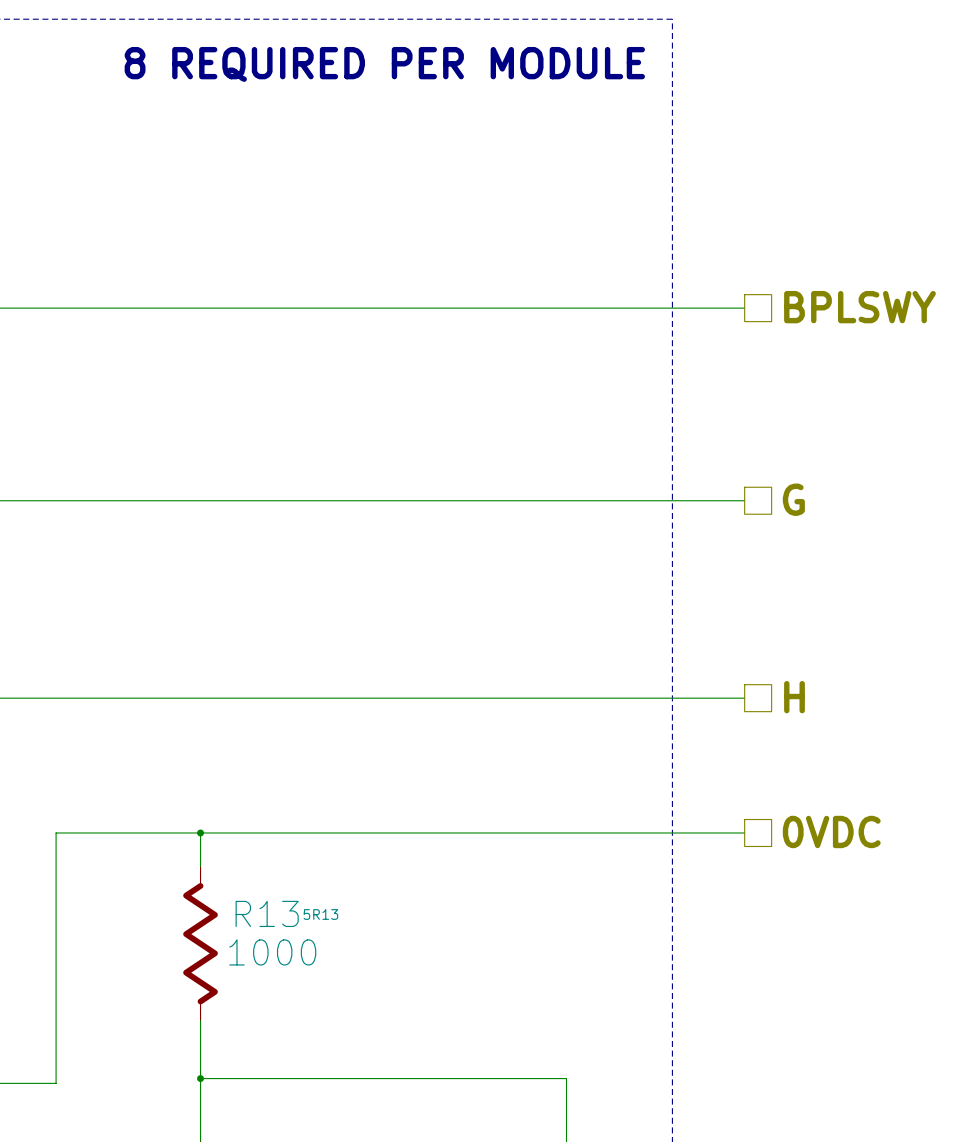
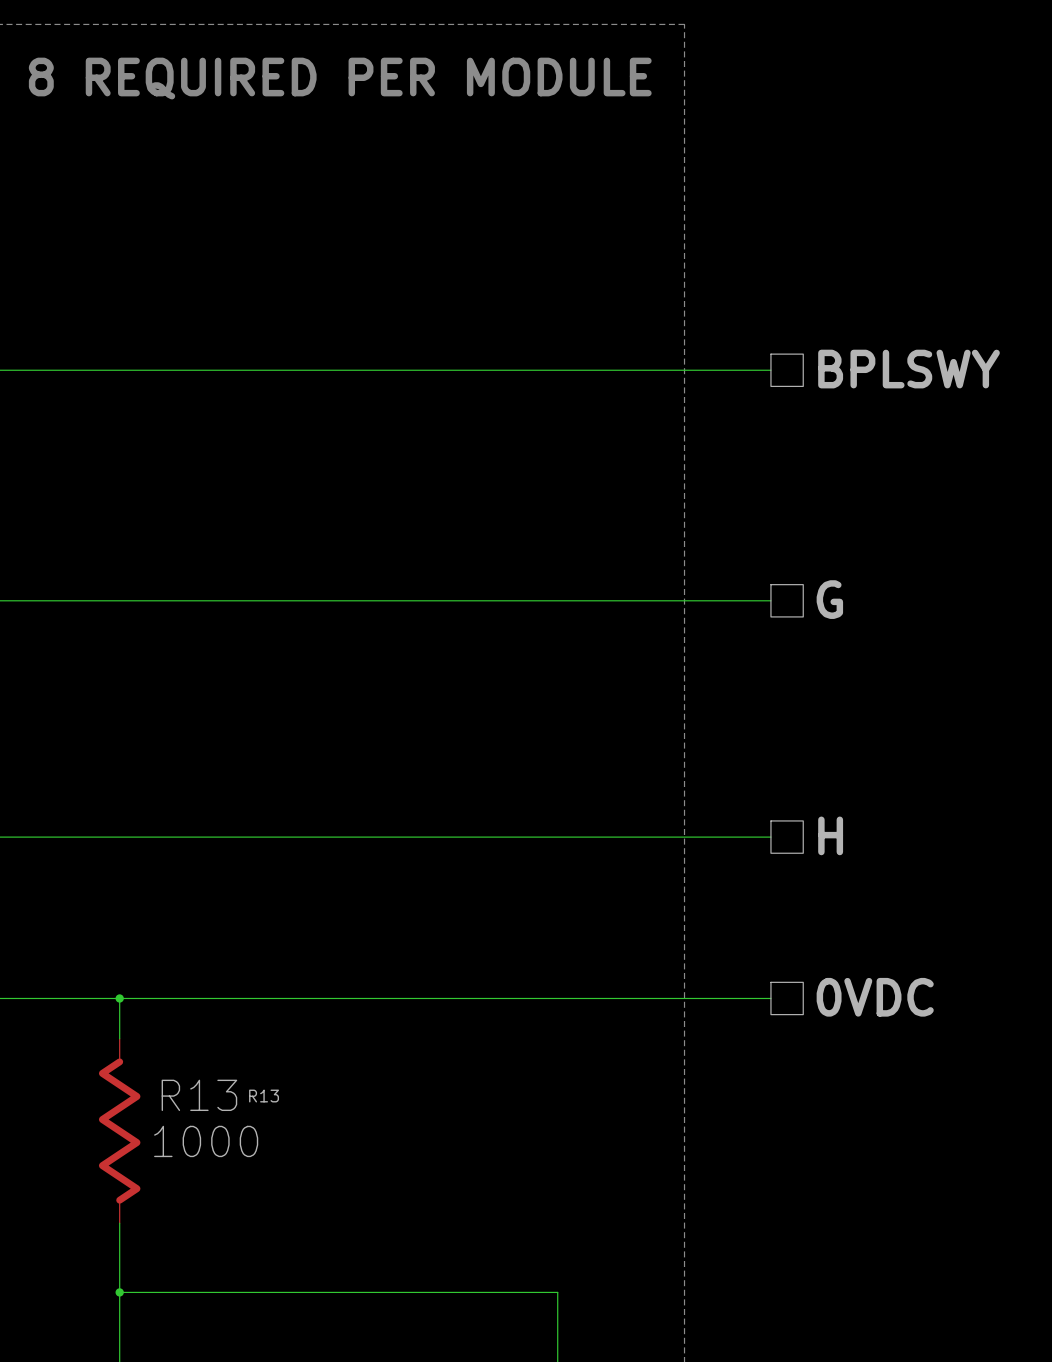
5R13 name: 5R13 (320, 914) -> R13 (264, 1096)

